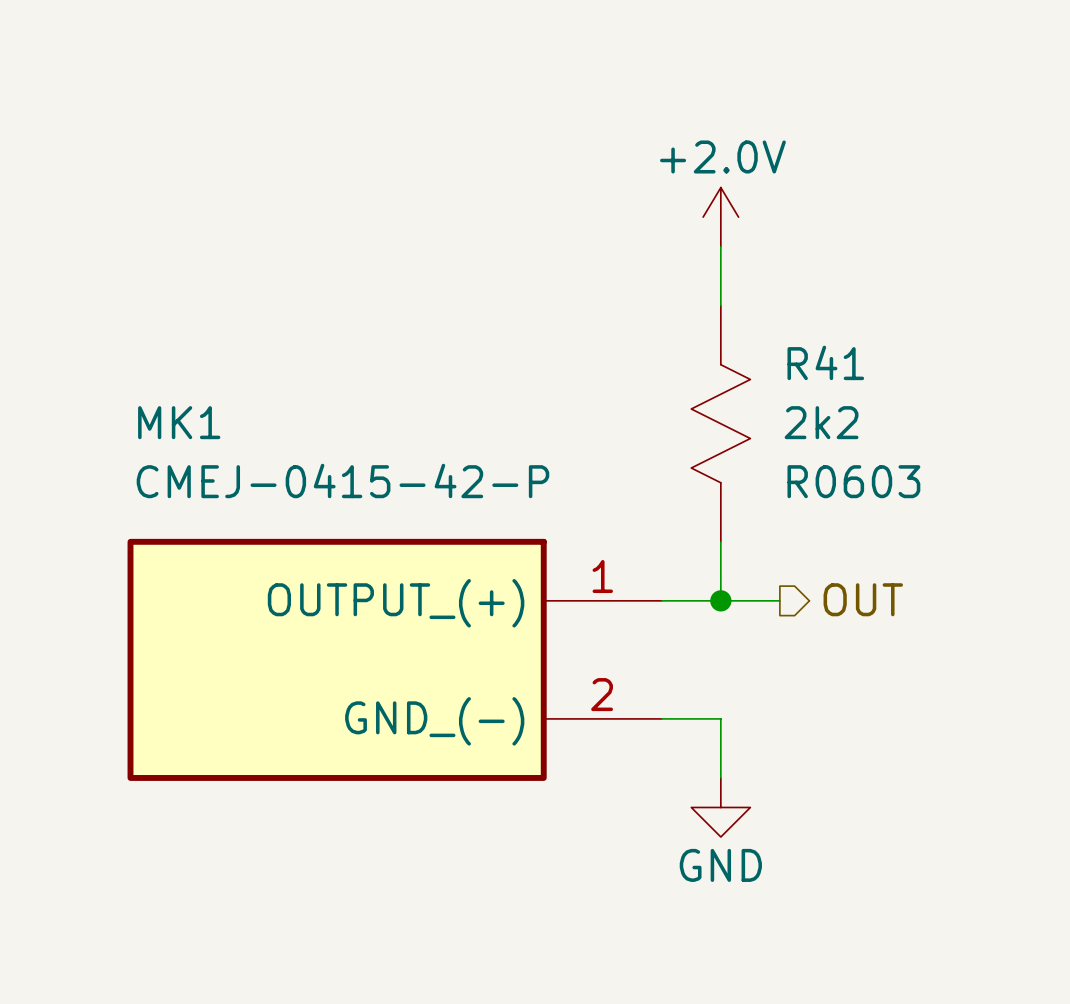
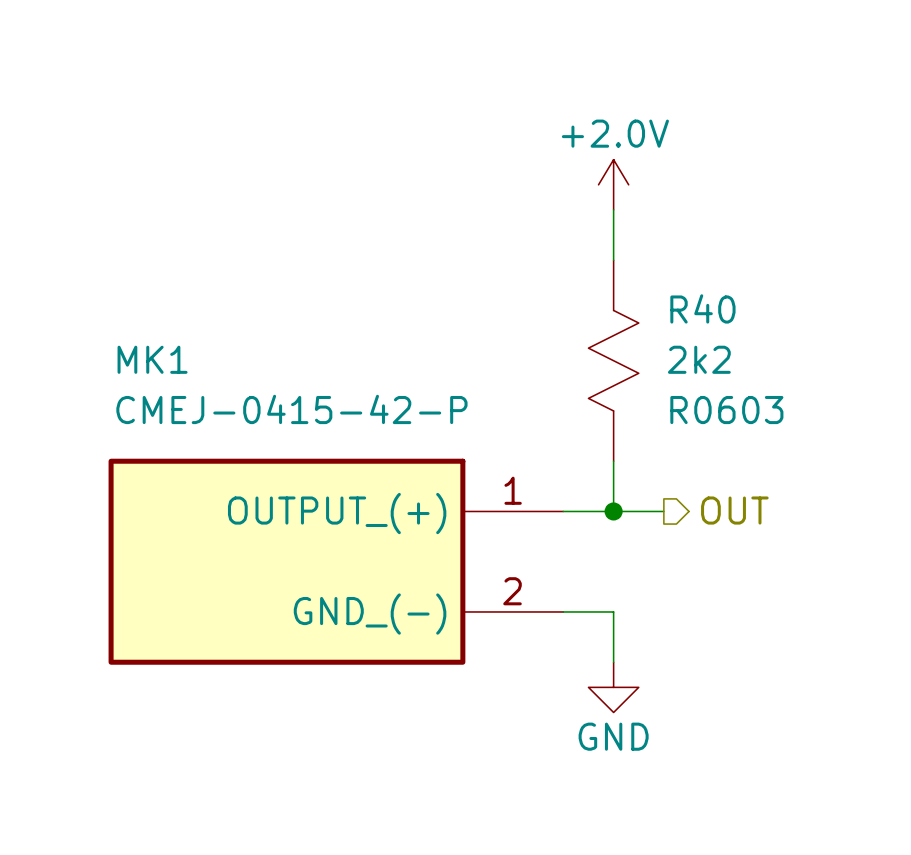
R41 name: R41 (825, 362) -> R40 (702, 308)

